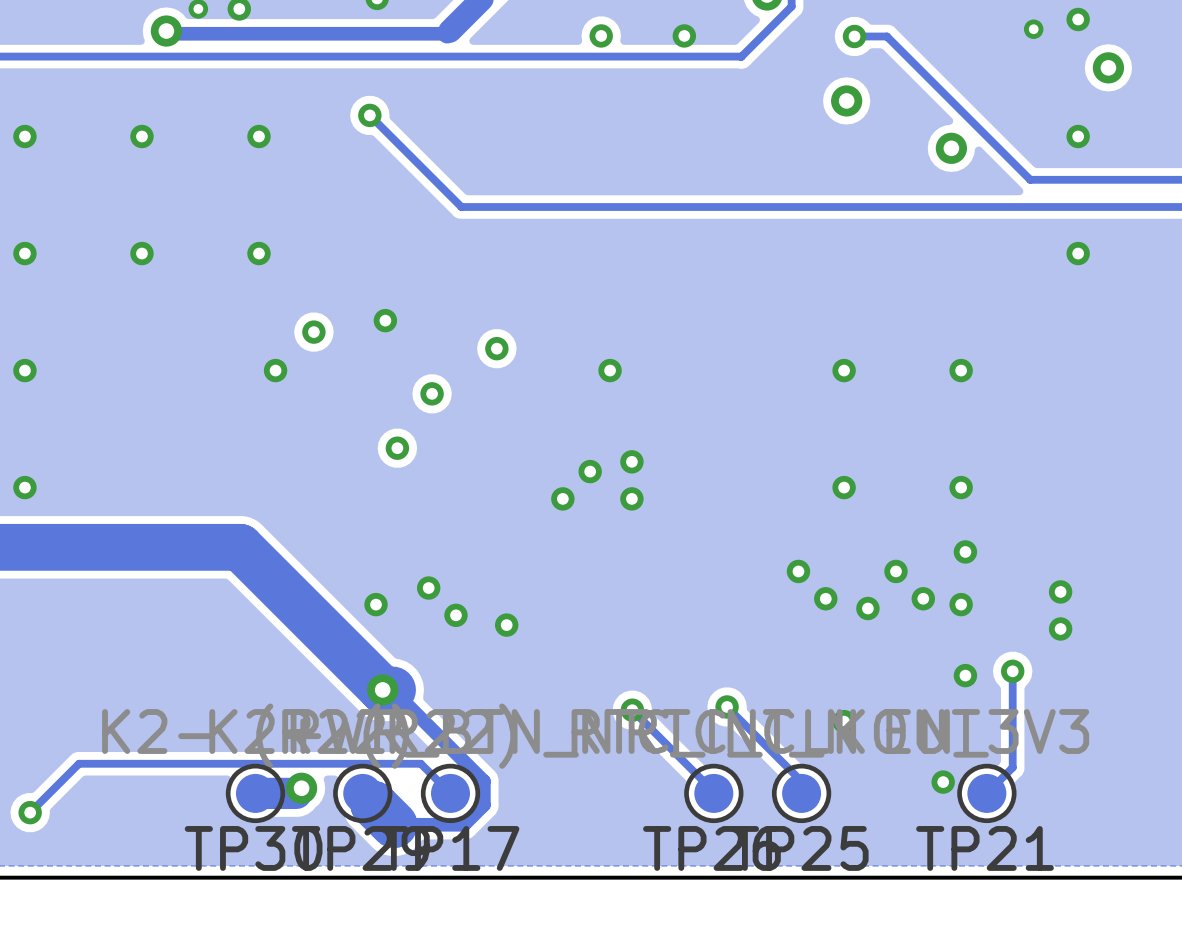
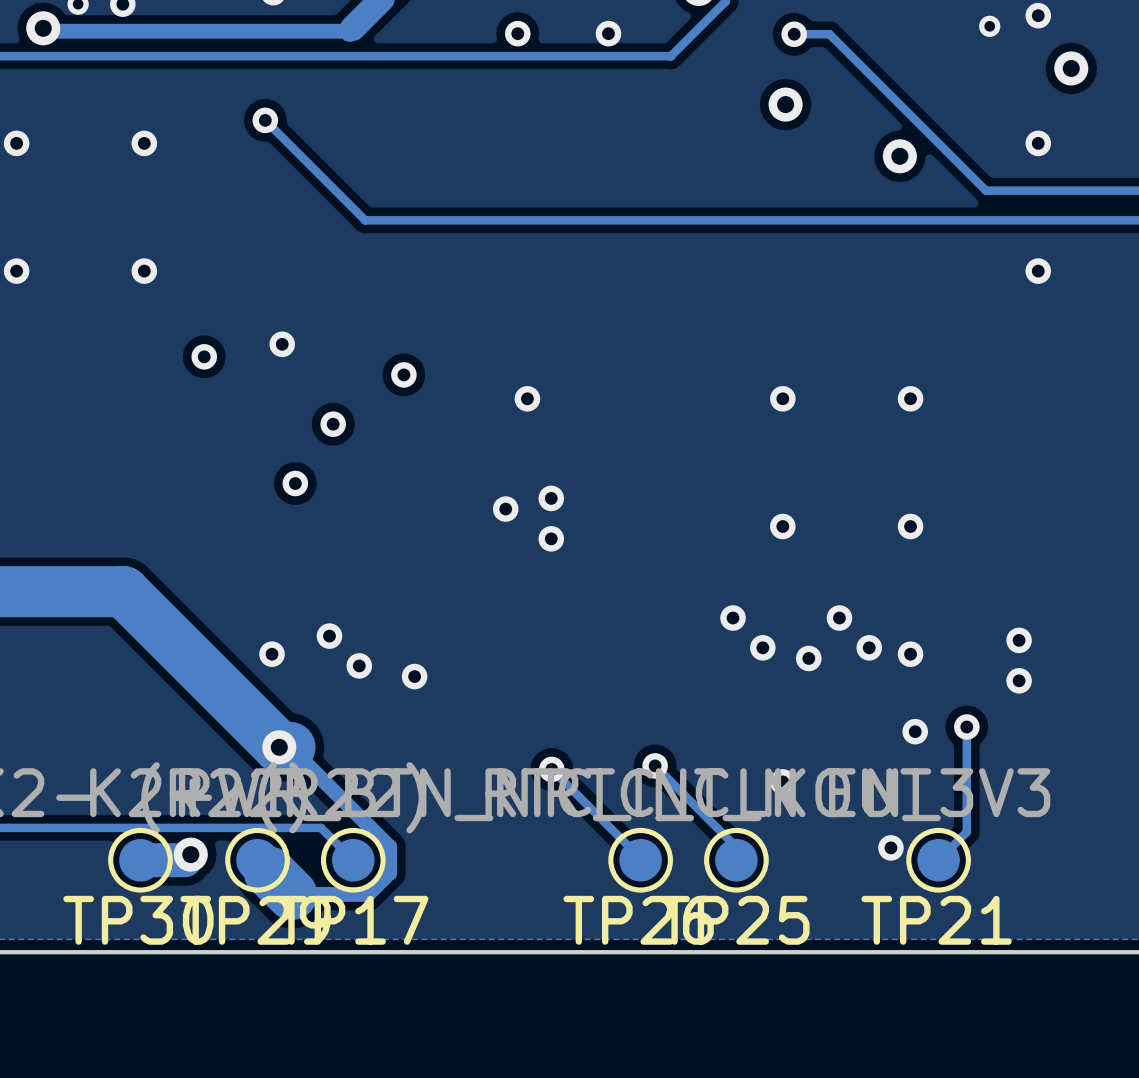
via: (275, 370) -> none
via: (562, 498) -> none
via: (965, 551) -> none

